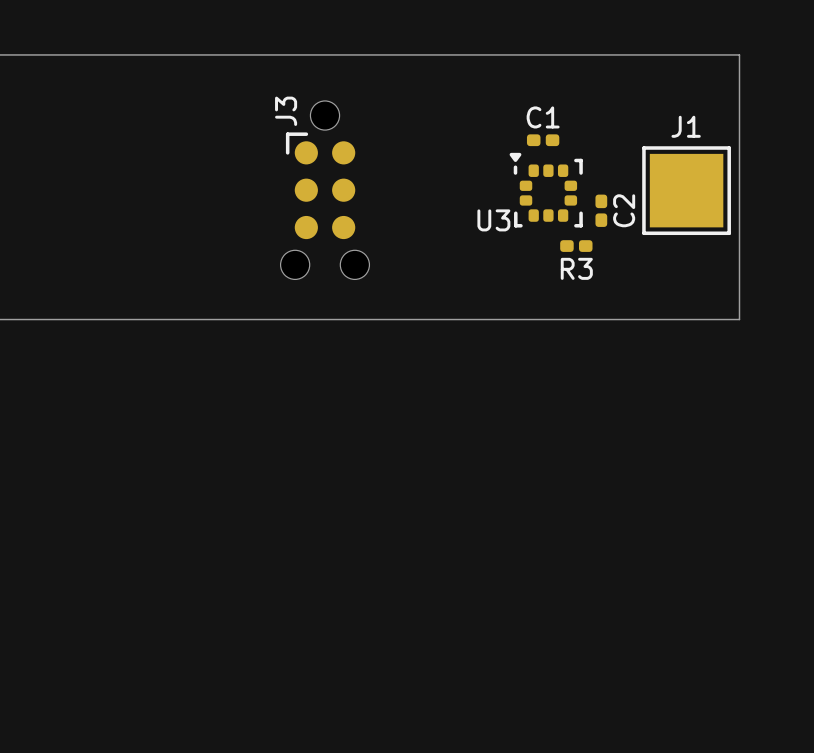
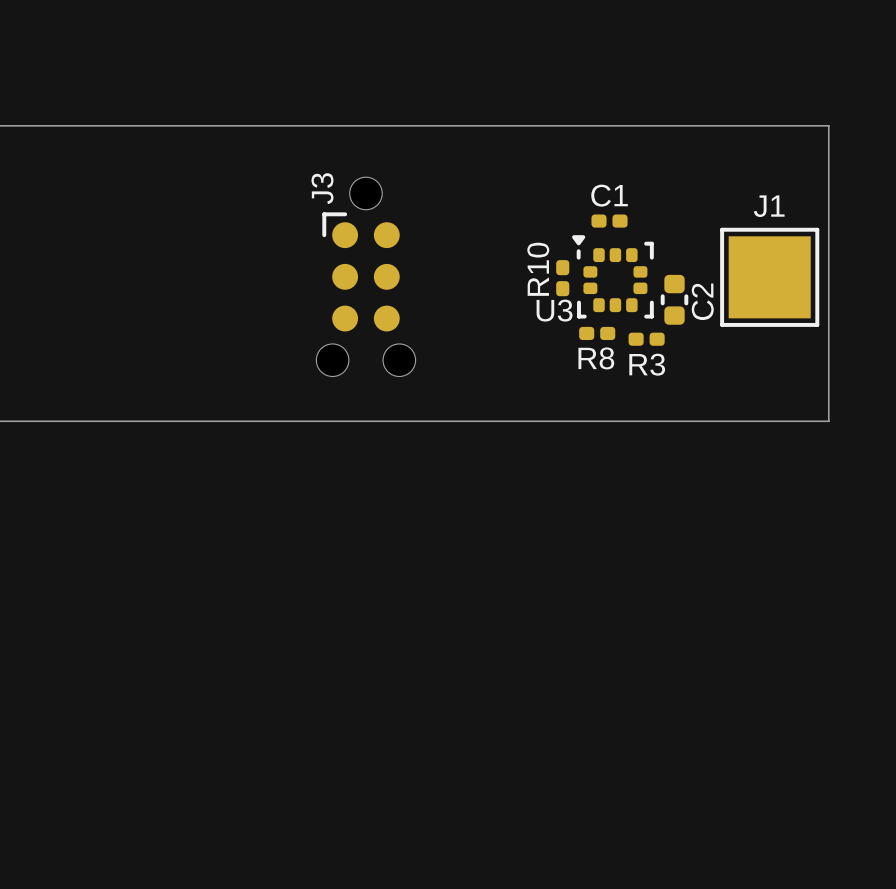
R10: none -> (562, 278)
C2 footprint: [595, 194, 608, 227] -> [660, 274, 689, 325]
R8: none -> (597, 333)

